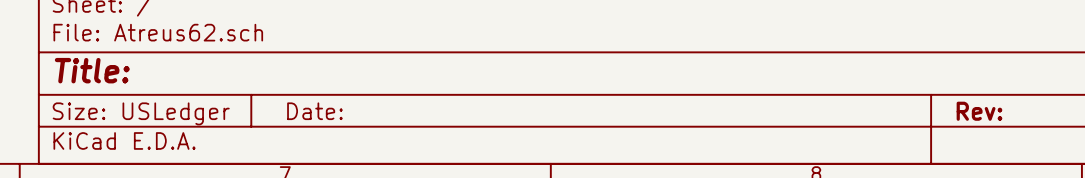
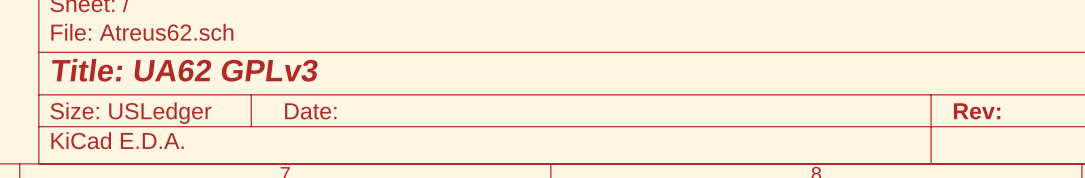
title block: Title: (92, 70) -> Title: UA62 GPLv3 (184, 70)

